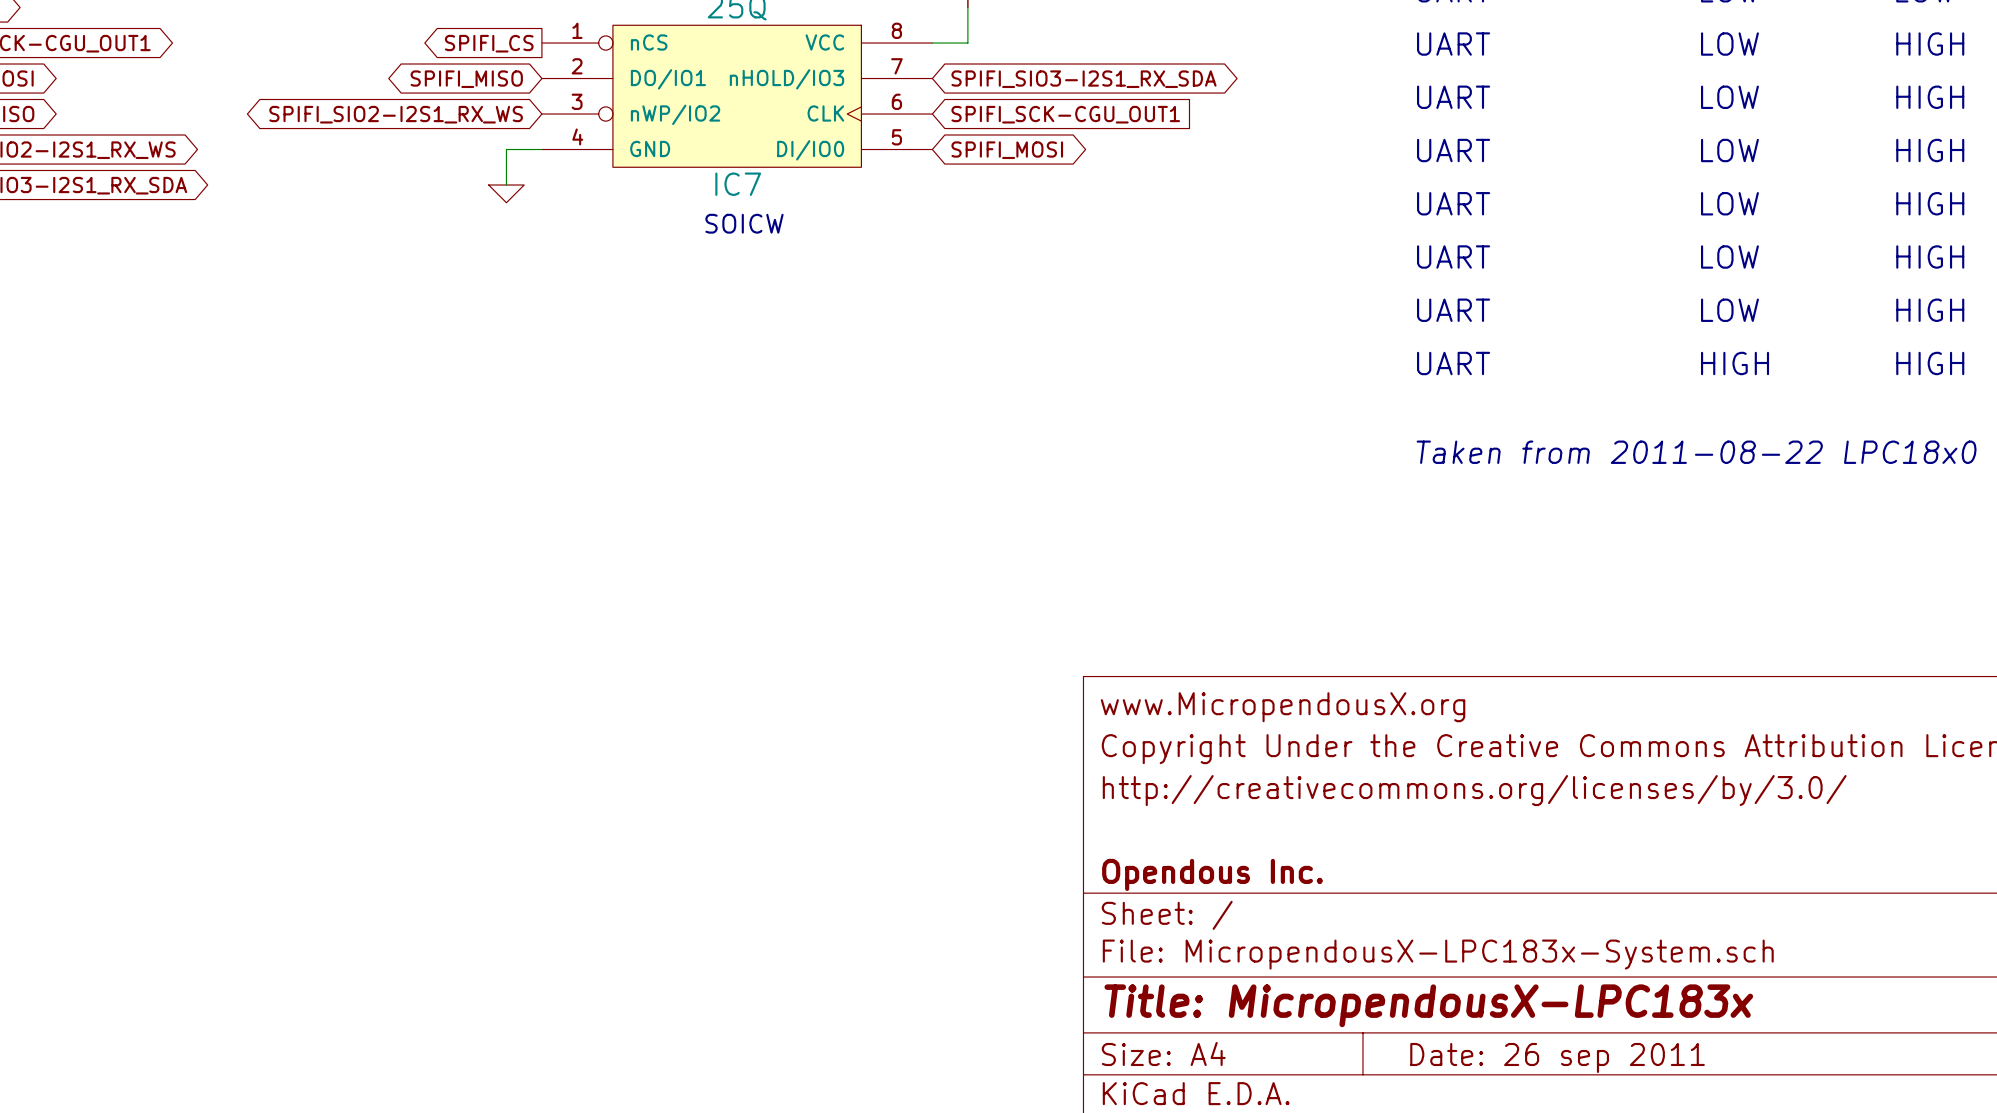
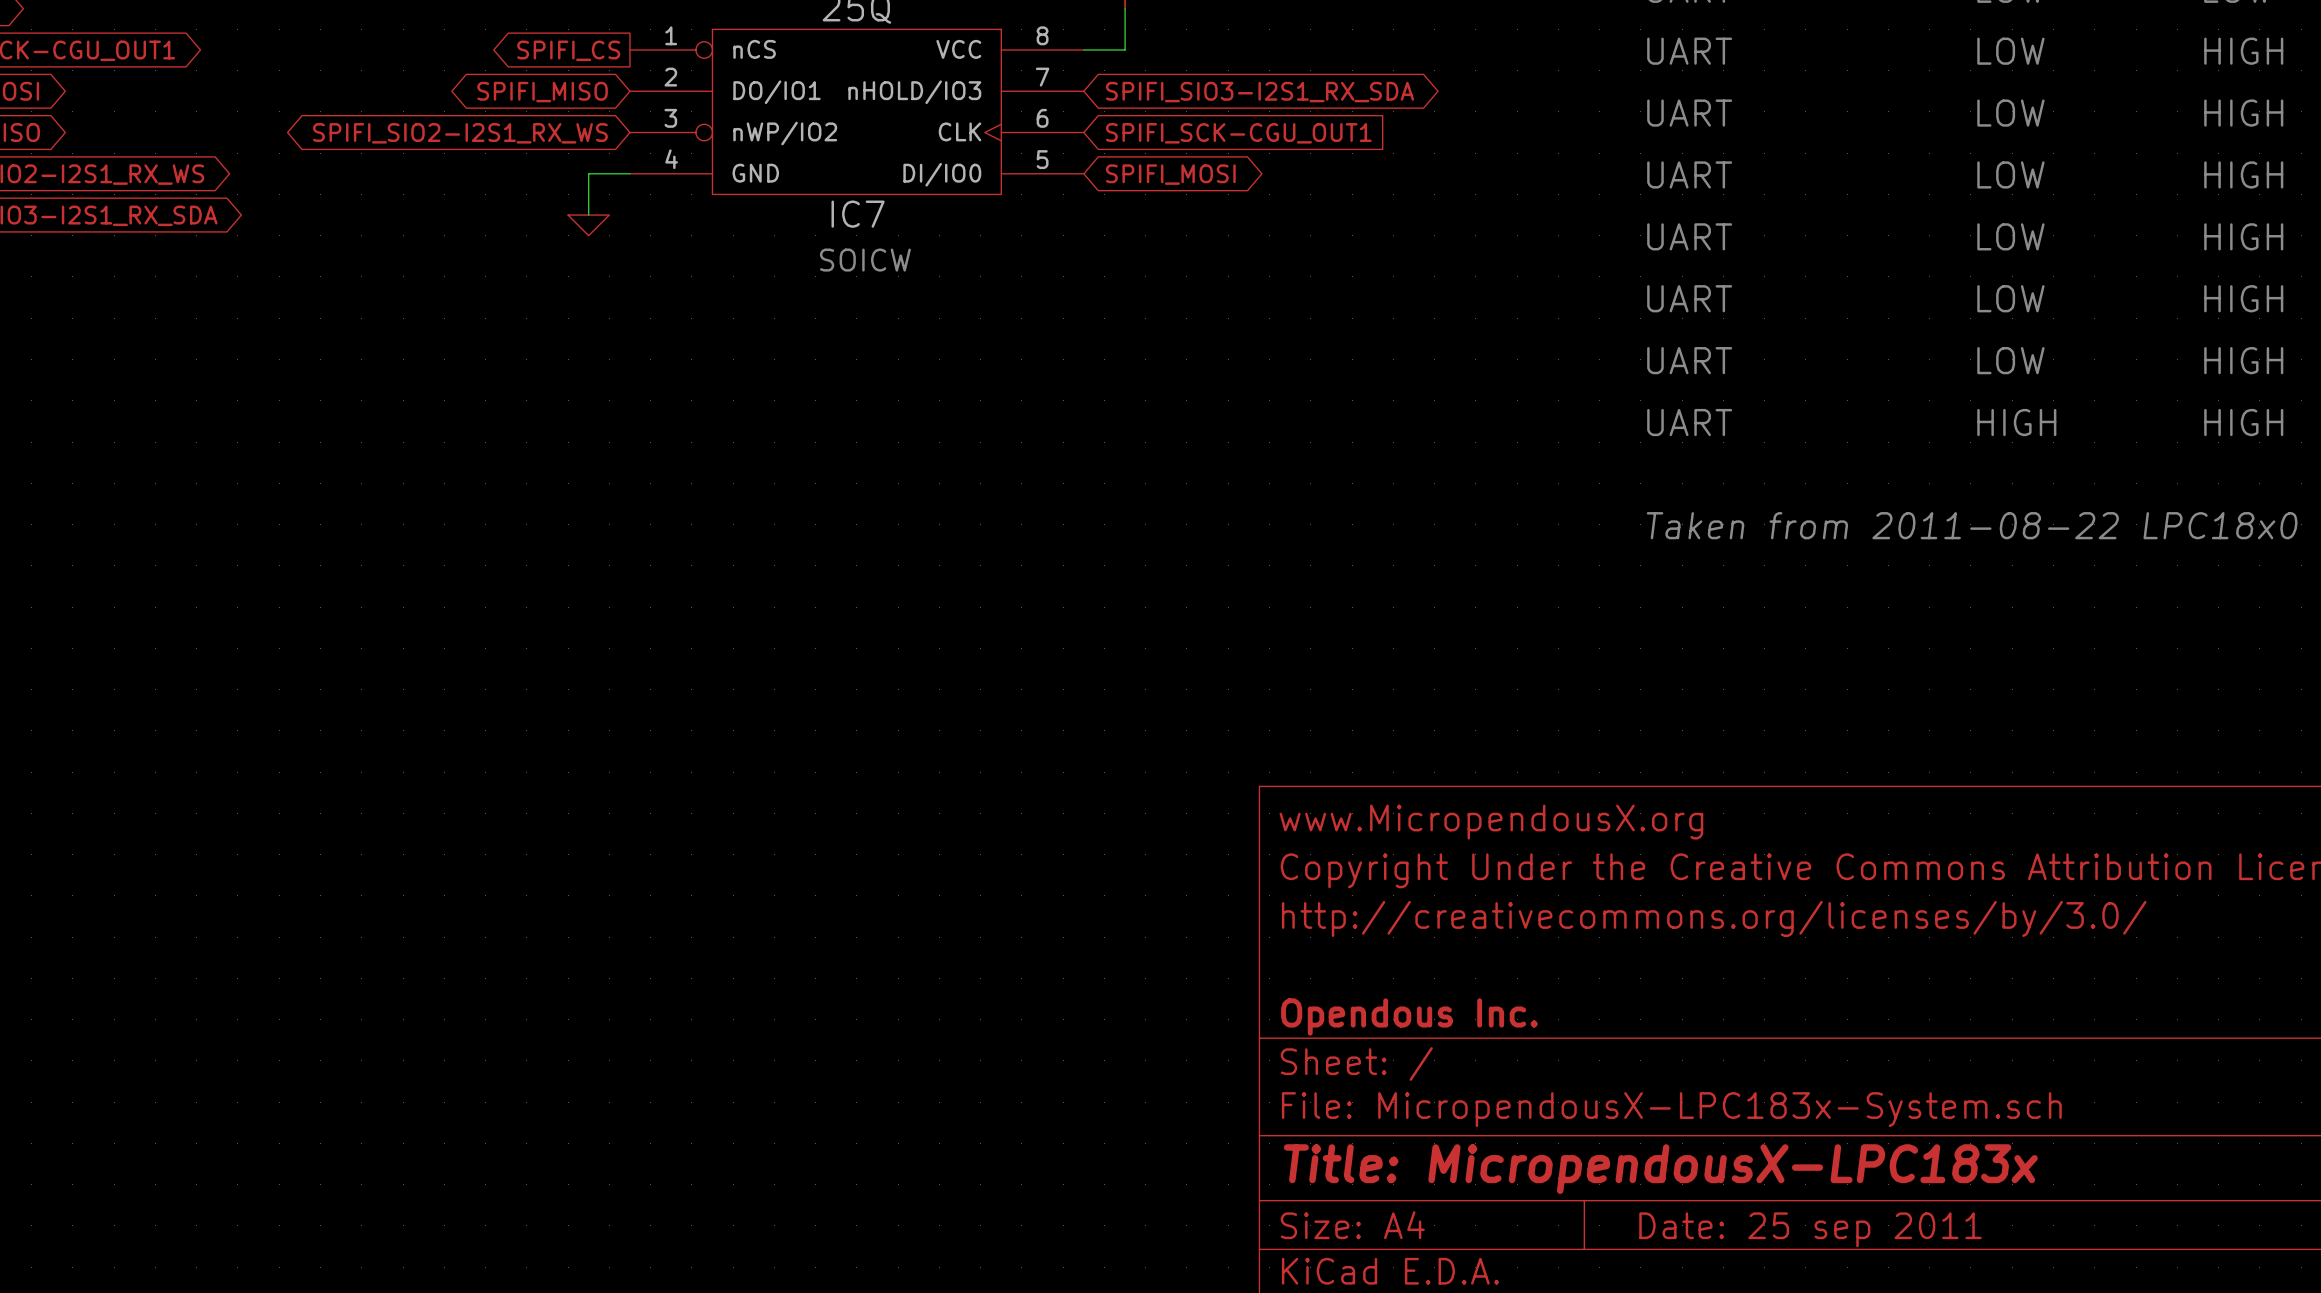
title block: Date: 26 sep 2011 (1557, 1057) -> Date: 25 sep 2011 (1810, 1229)

